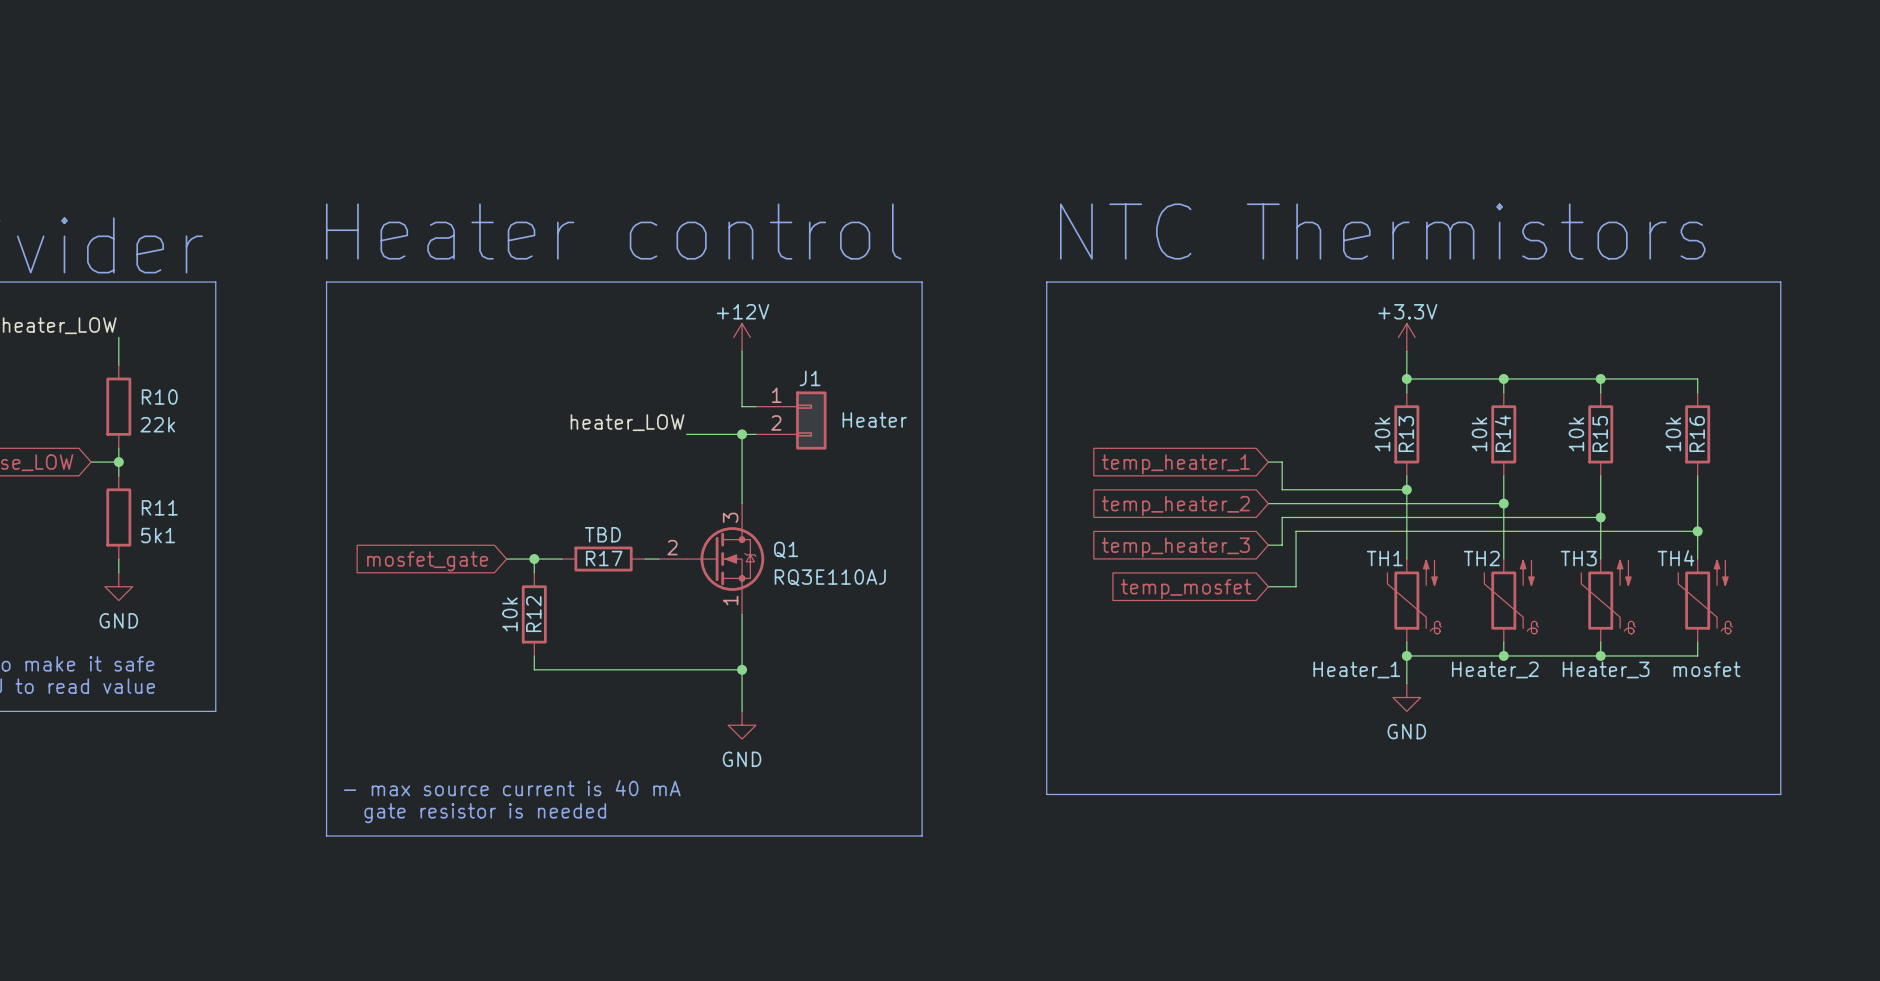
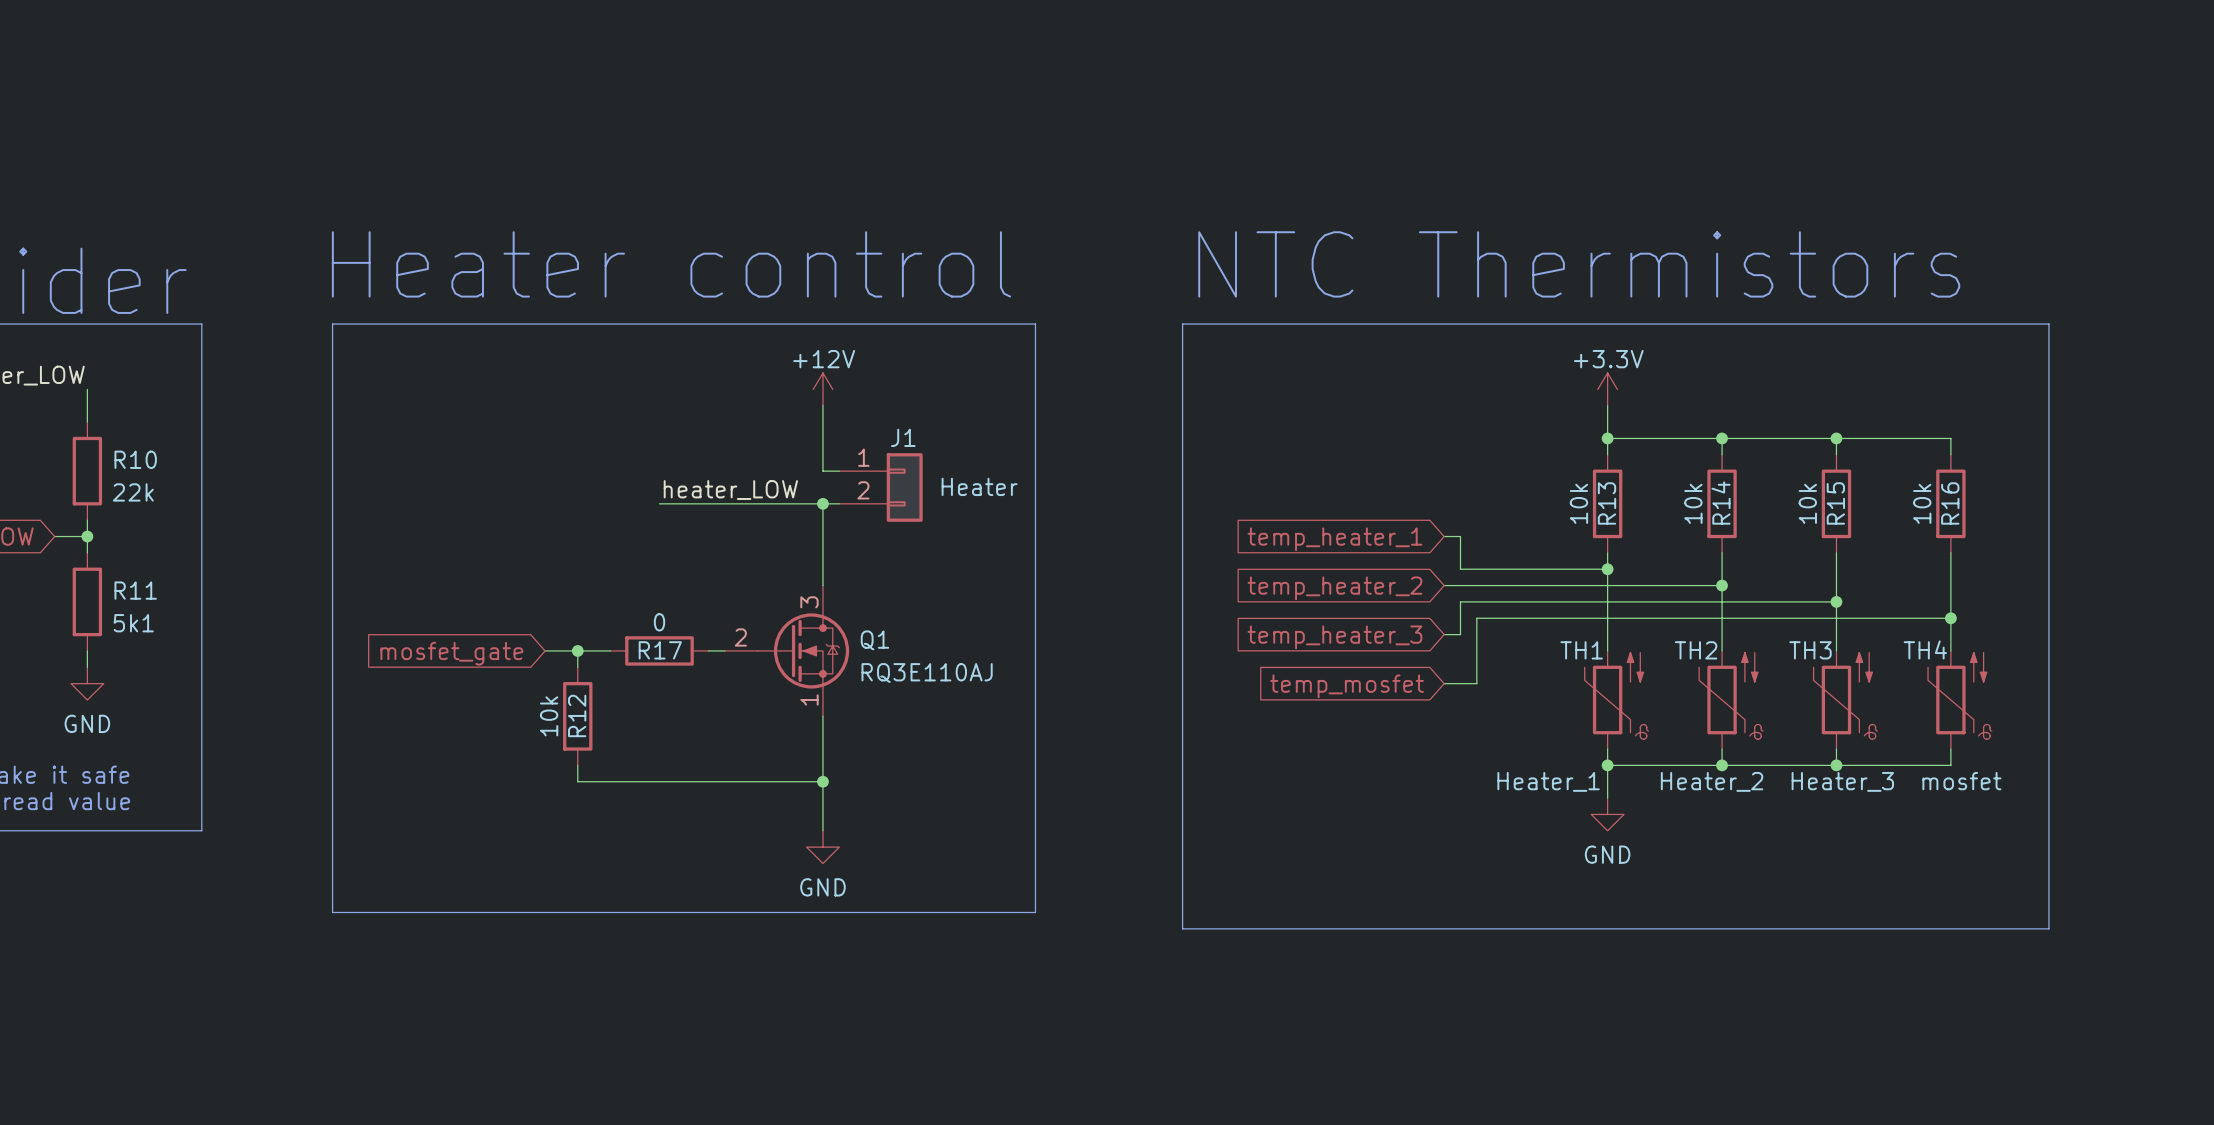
label position: heater_LOW (627, 422) -> heater_LOW (730, 490)
wire: none -> (659, 503) (757, 503)
R17 value: TBD (602, 534) -> 0 (659, 622)
line: (326, 780) (326, 836) (922, 836) (922, 780) -> (332, 912) (1035, 912)
text: - max source current is 40 mA (512, 788) -> none
text: gate resistor is needed (485, 813) -> none

